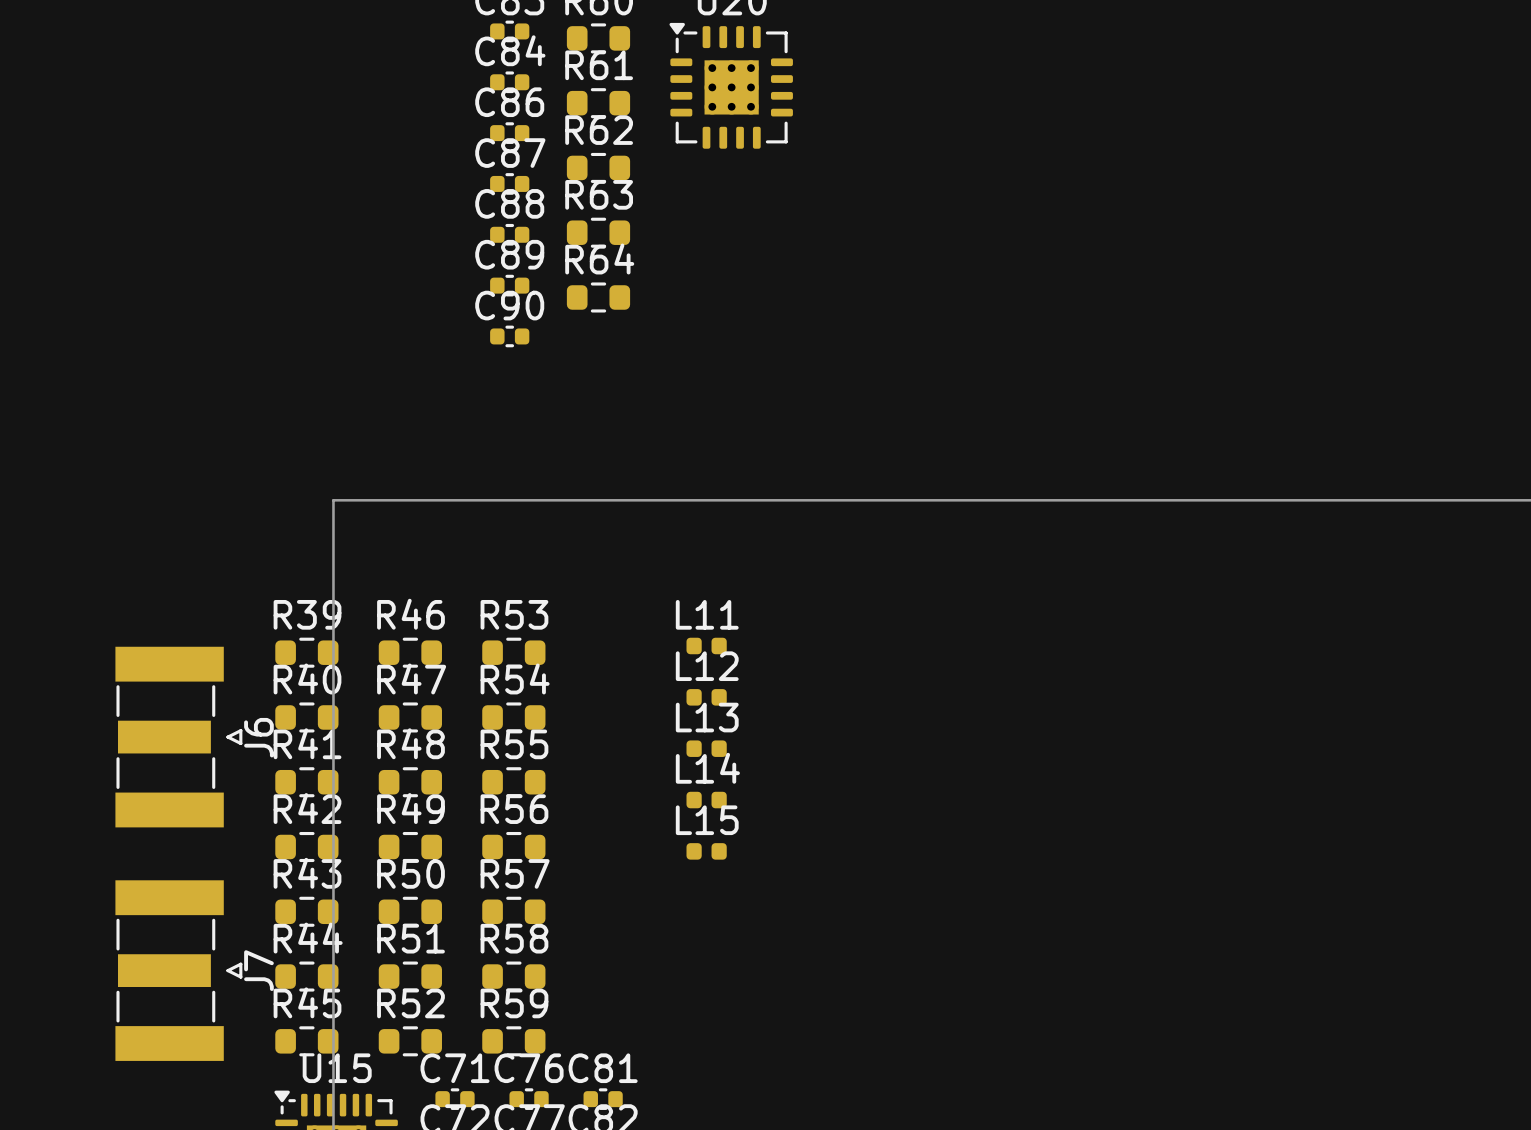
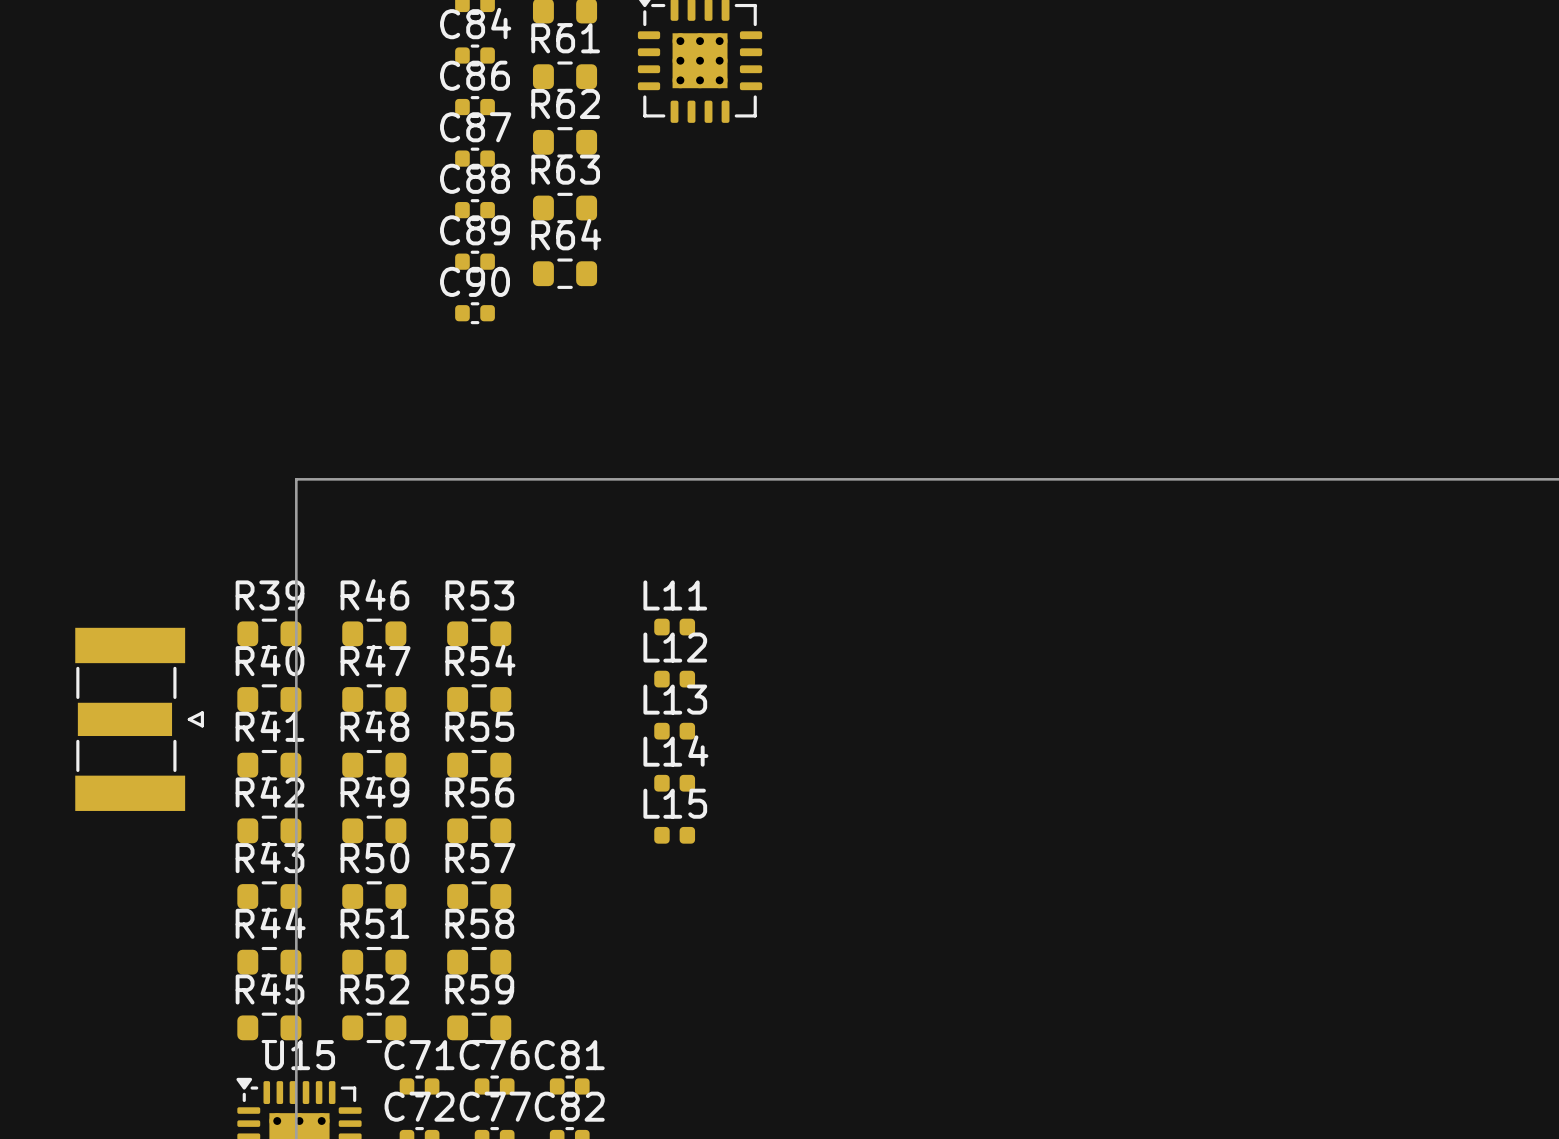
J6 name: J6 (258, 737) -> none
J7: (178, 970) -> none

